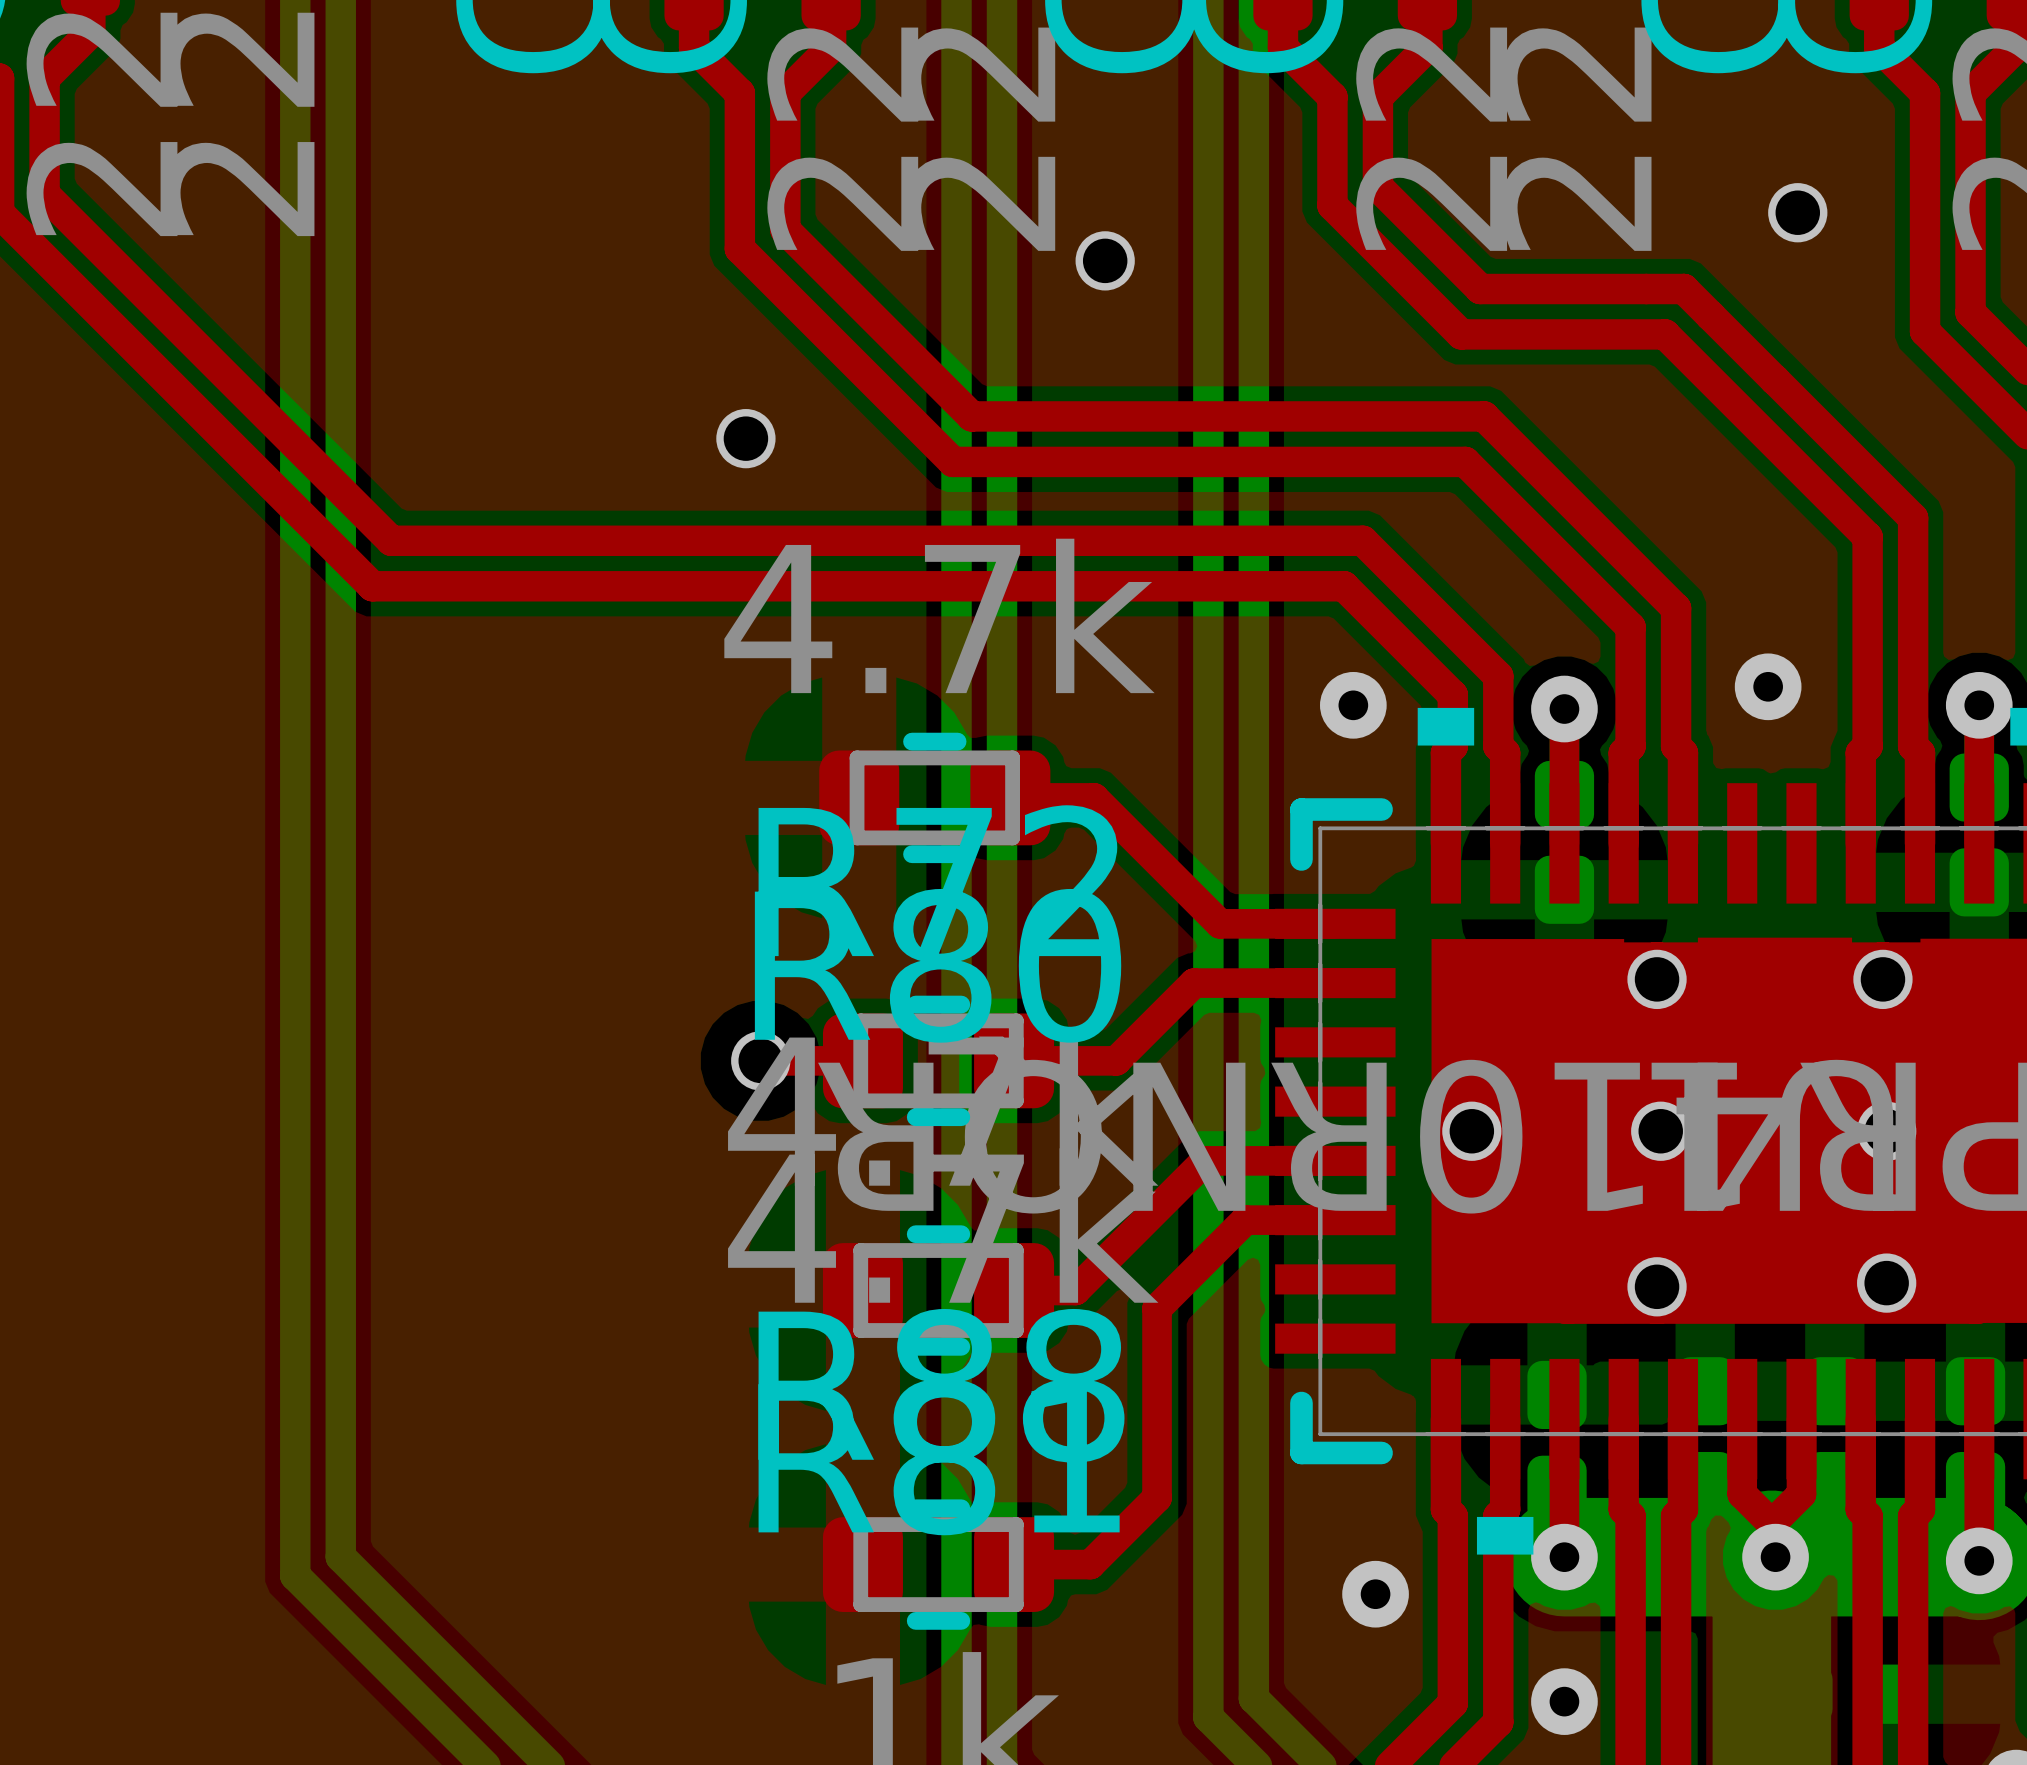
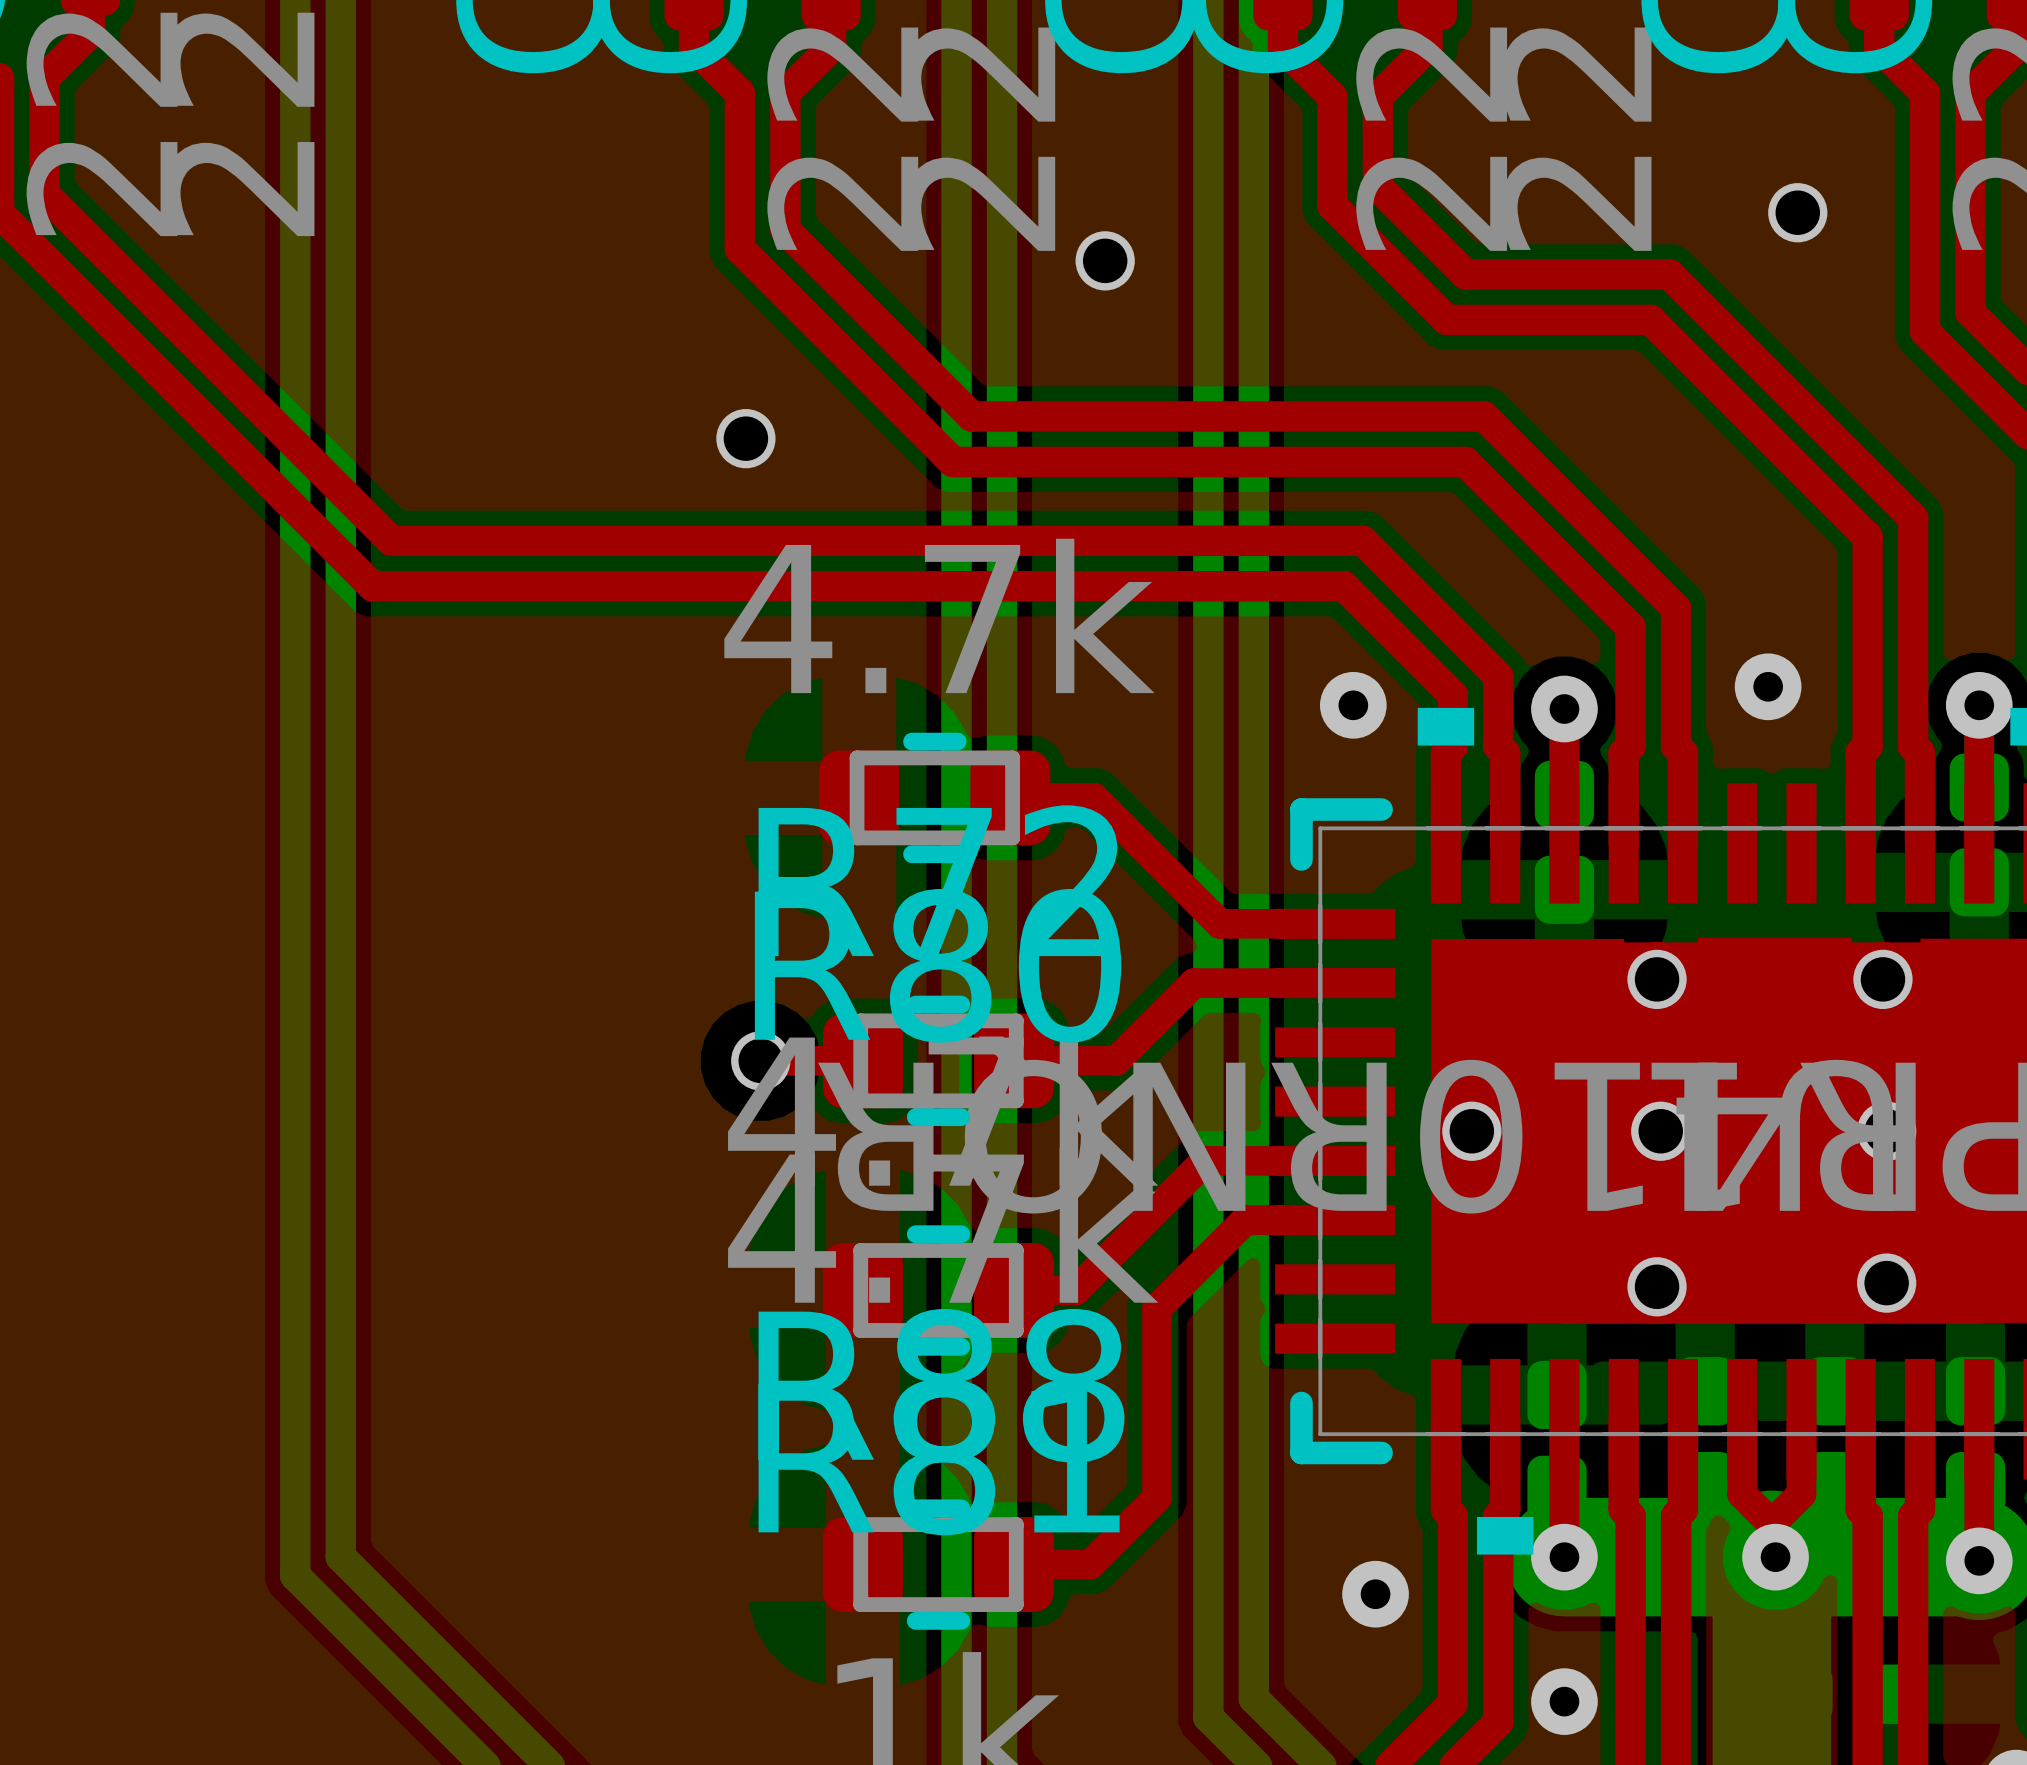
top track: (1465, 274) (1480, 289) (1683, 289) -> (1465, 274) (1669, 274) (1683, 289)
top track: (1446, 319) (1461, 334) (1665, 334) -> (1446, 319) (1650, 319) (1665, 334)

